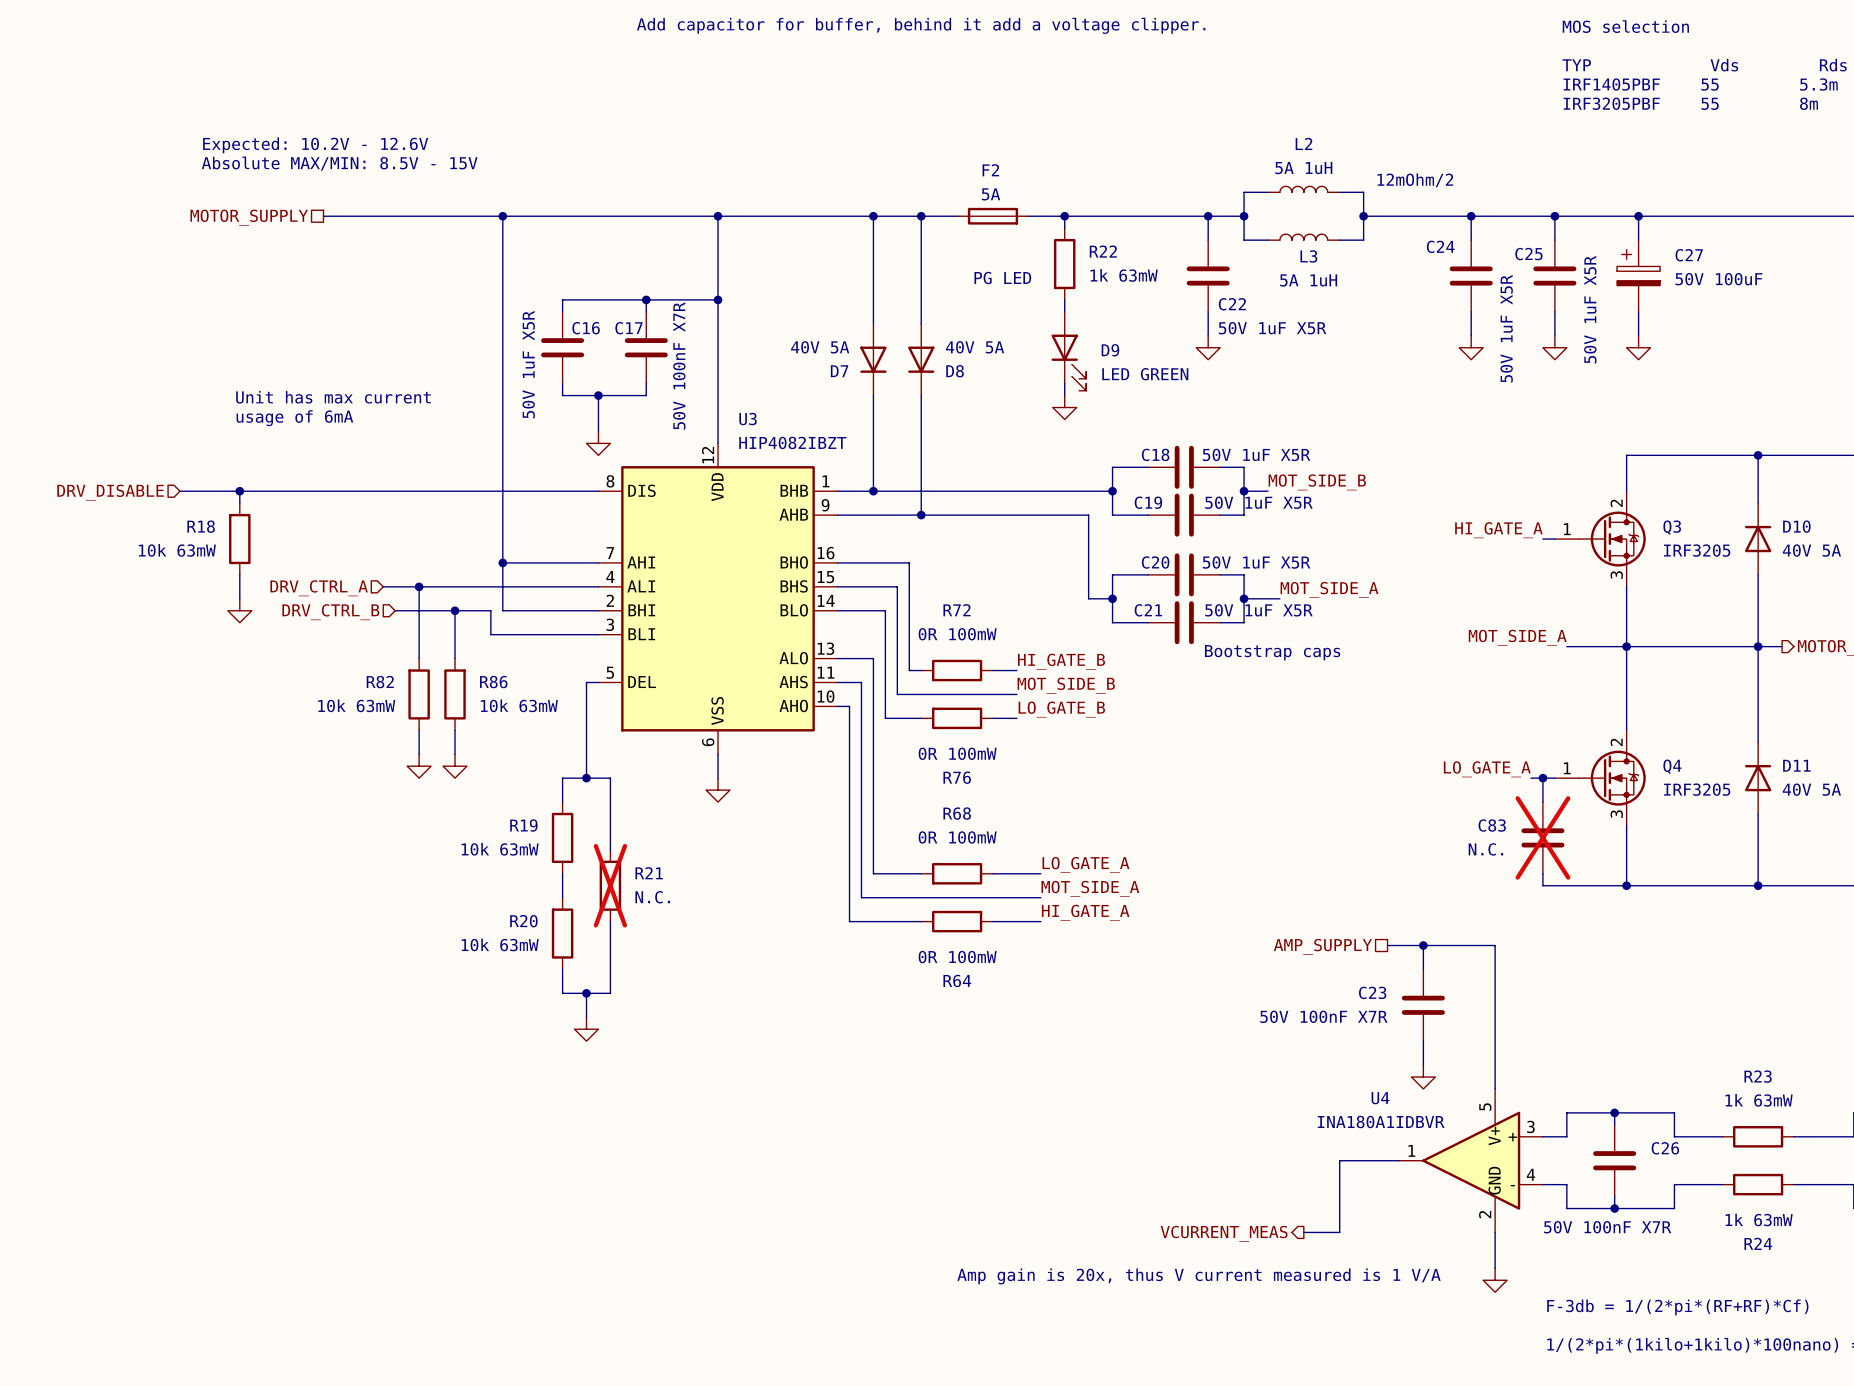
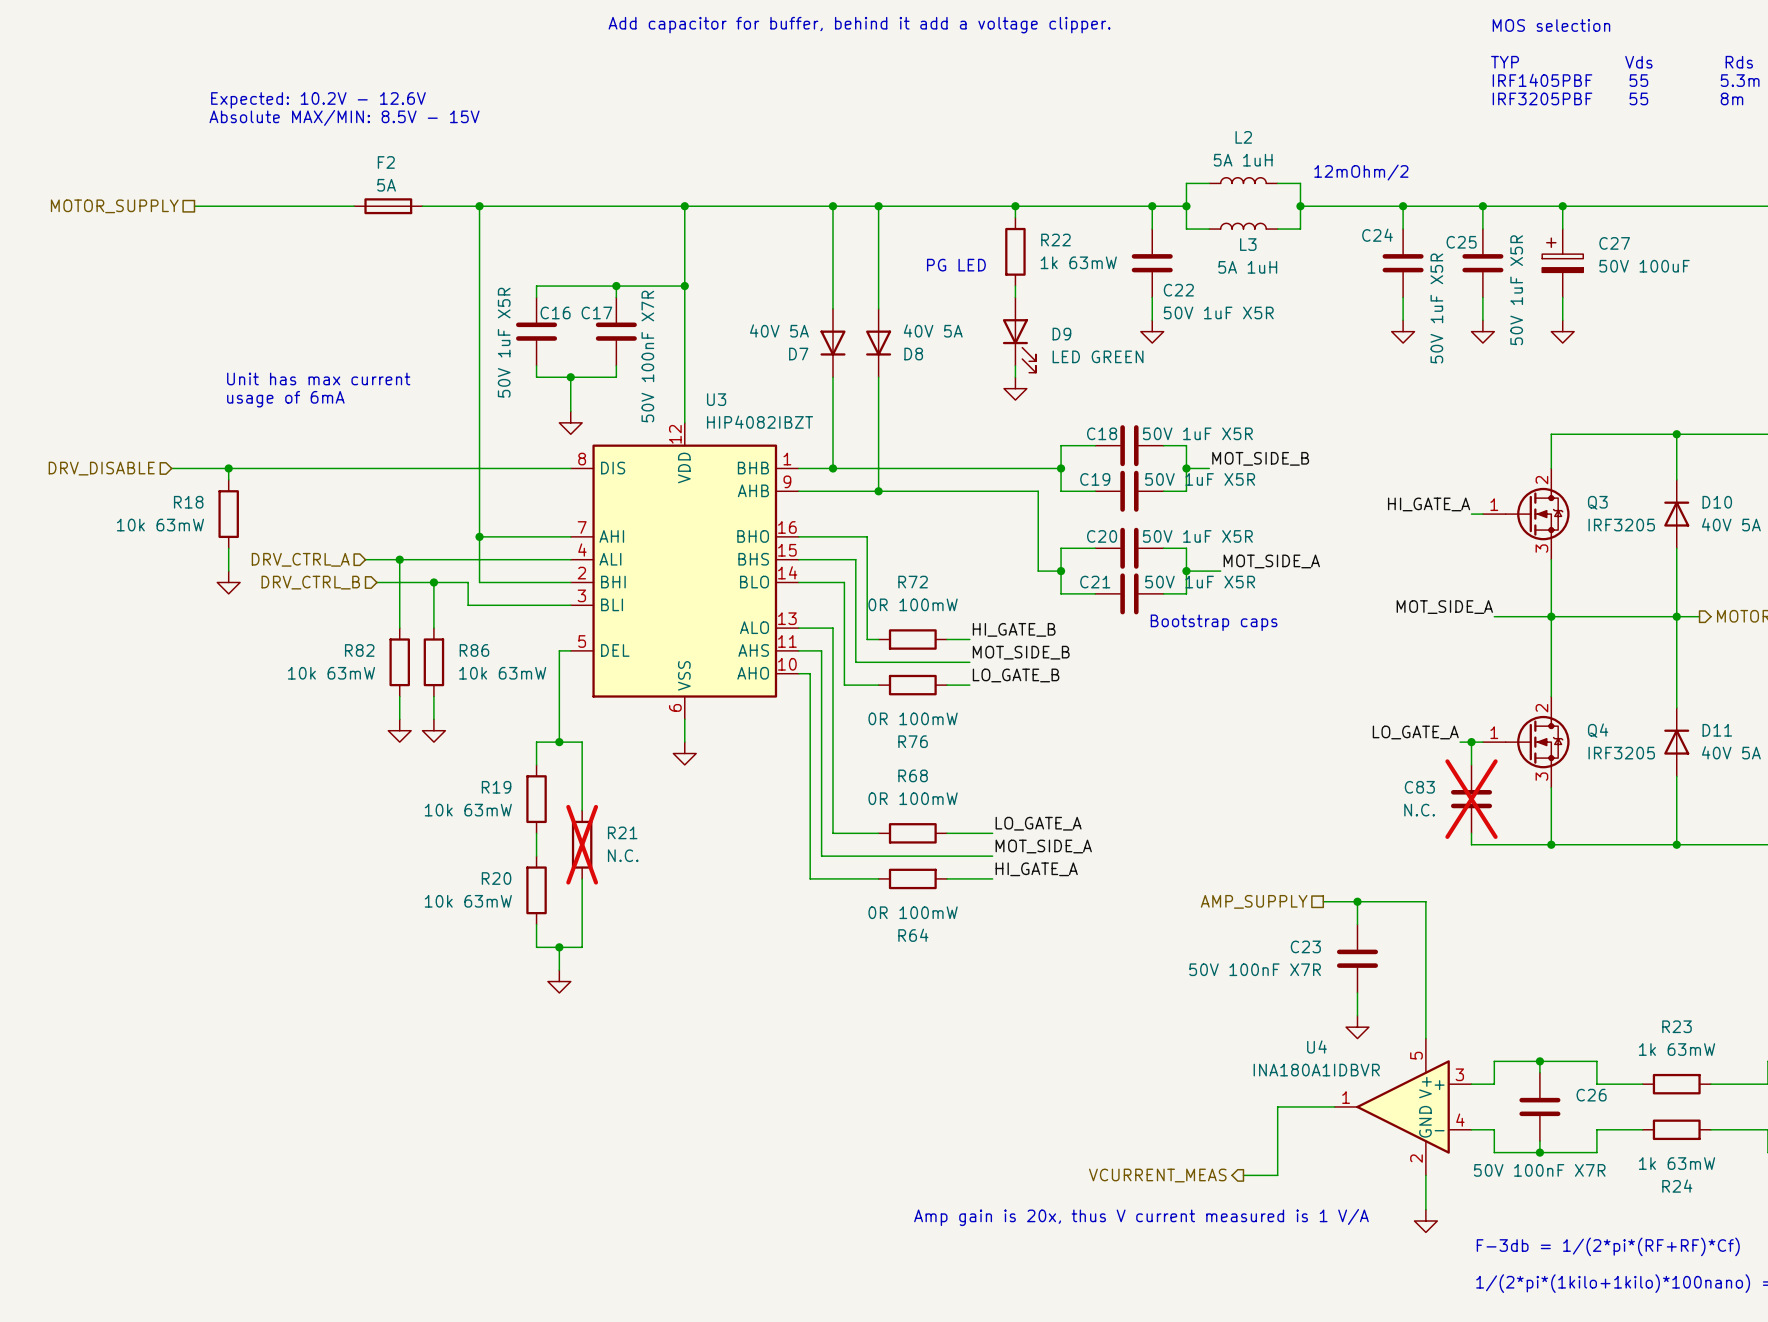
text position: Expected: 10.2V - 12.6V (315, 145) -> Expected: 10.2V - 12.6V (318, 100)
text position: Absolute MAX/MIN: 8.5V - 15V (339, 163) -> Absolute MAX/MIN: 8.5V - 15V (344, 117)
wire: none -> (194, 206) (308, 206)
F2 position: (992, 216) -> (388, 206)
hierarchical label position: MOTOR_SUPPLY (249, 217) -> MOTOR_SUPPLY (114, 206)

